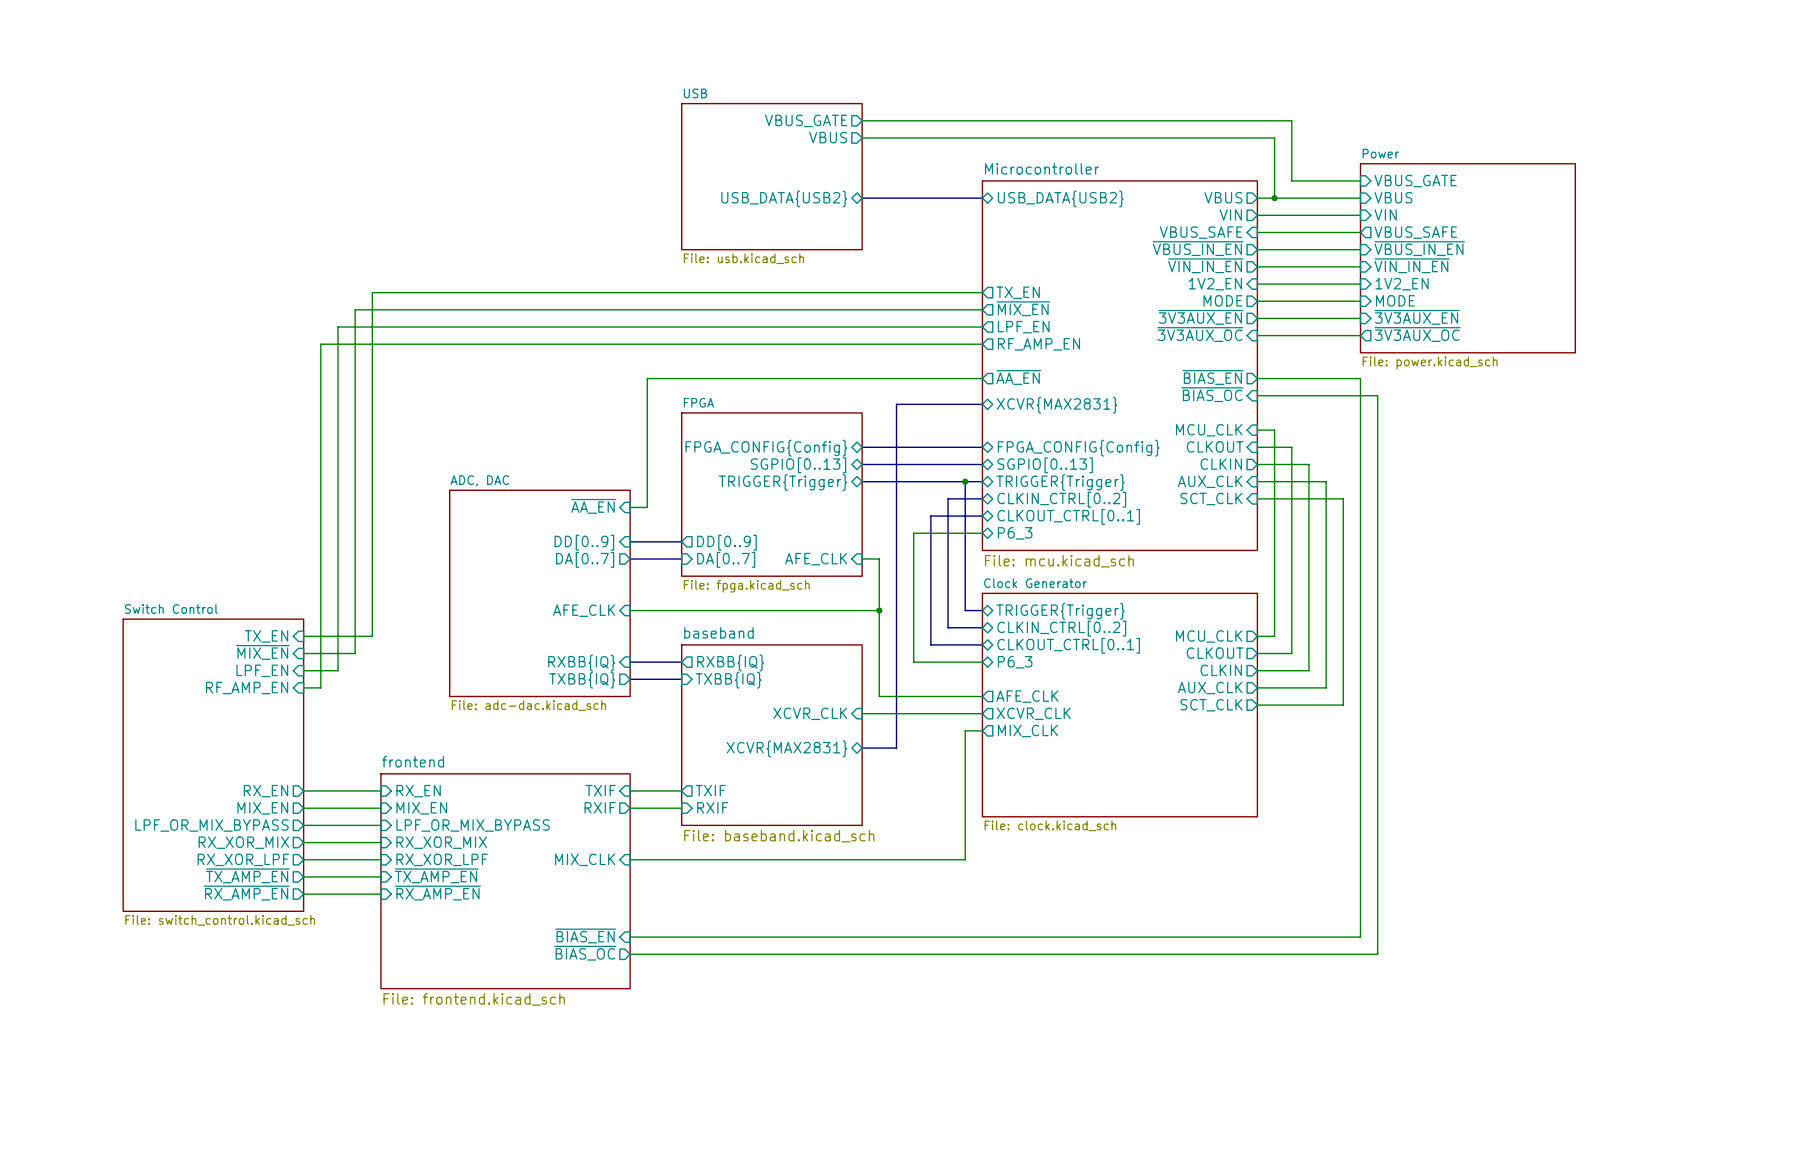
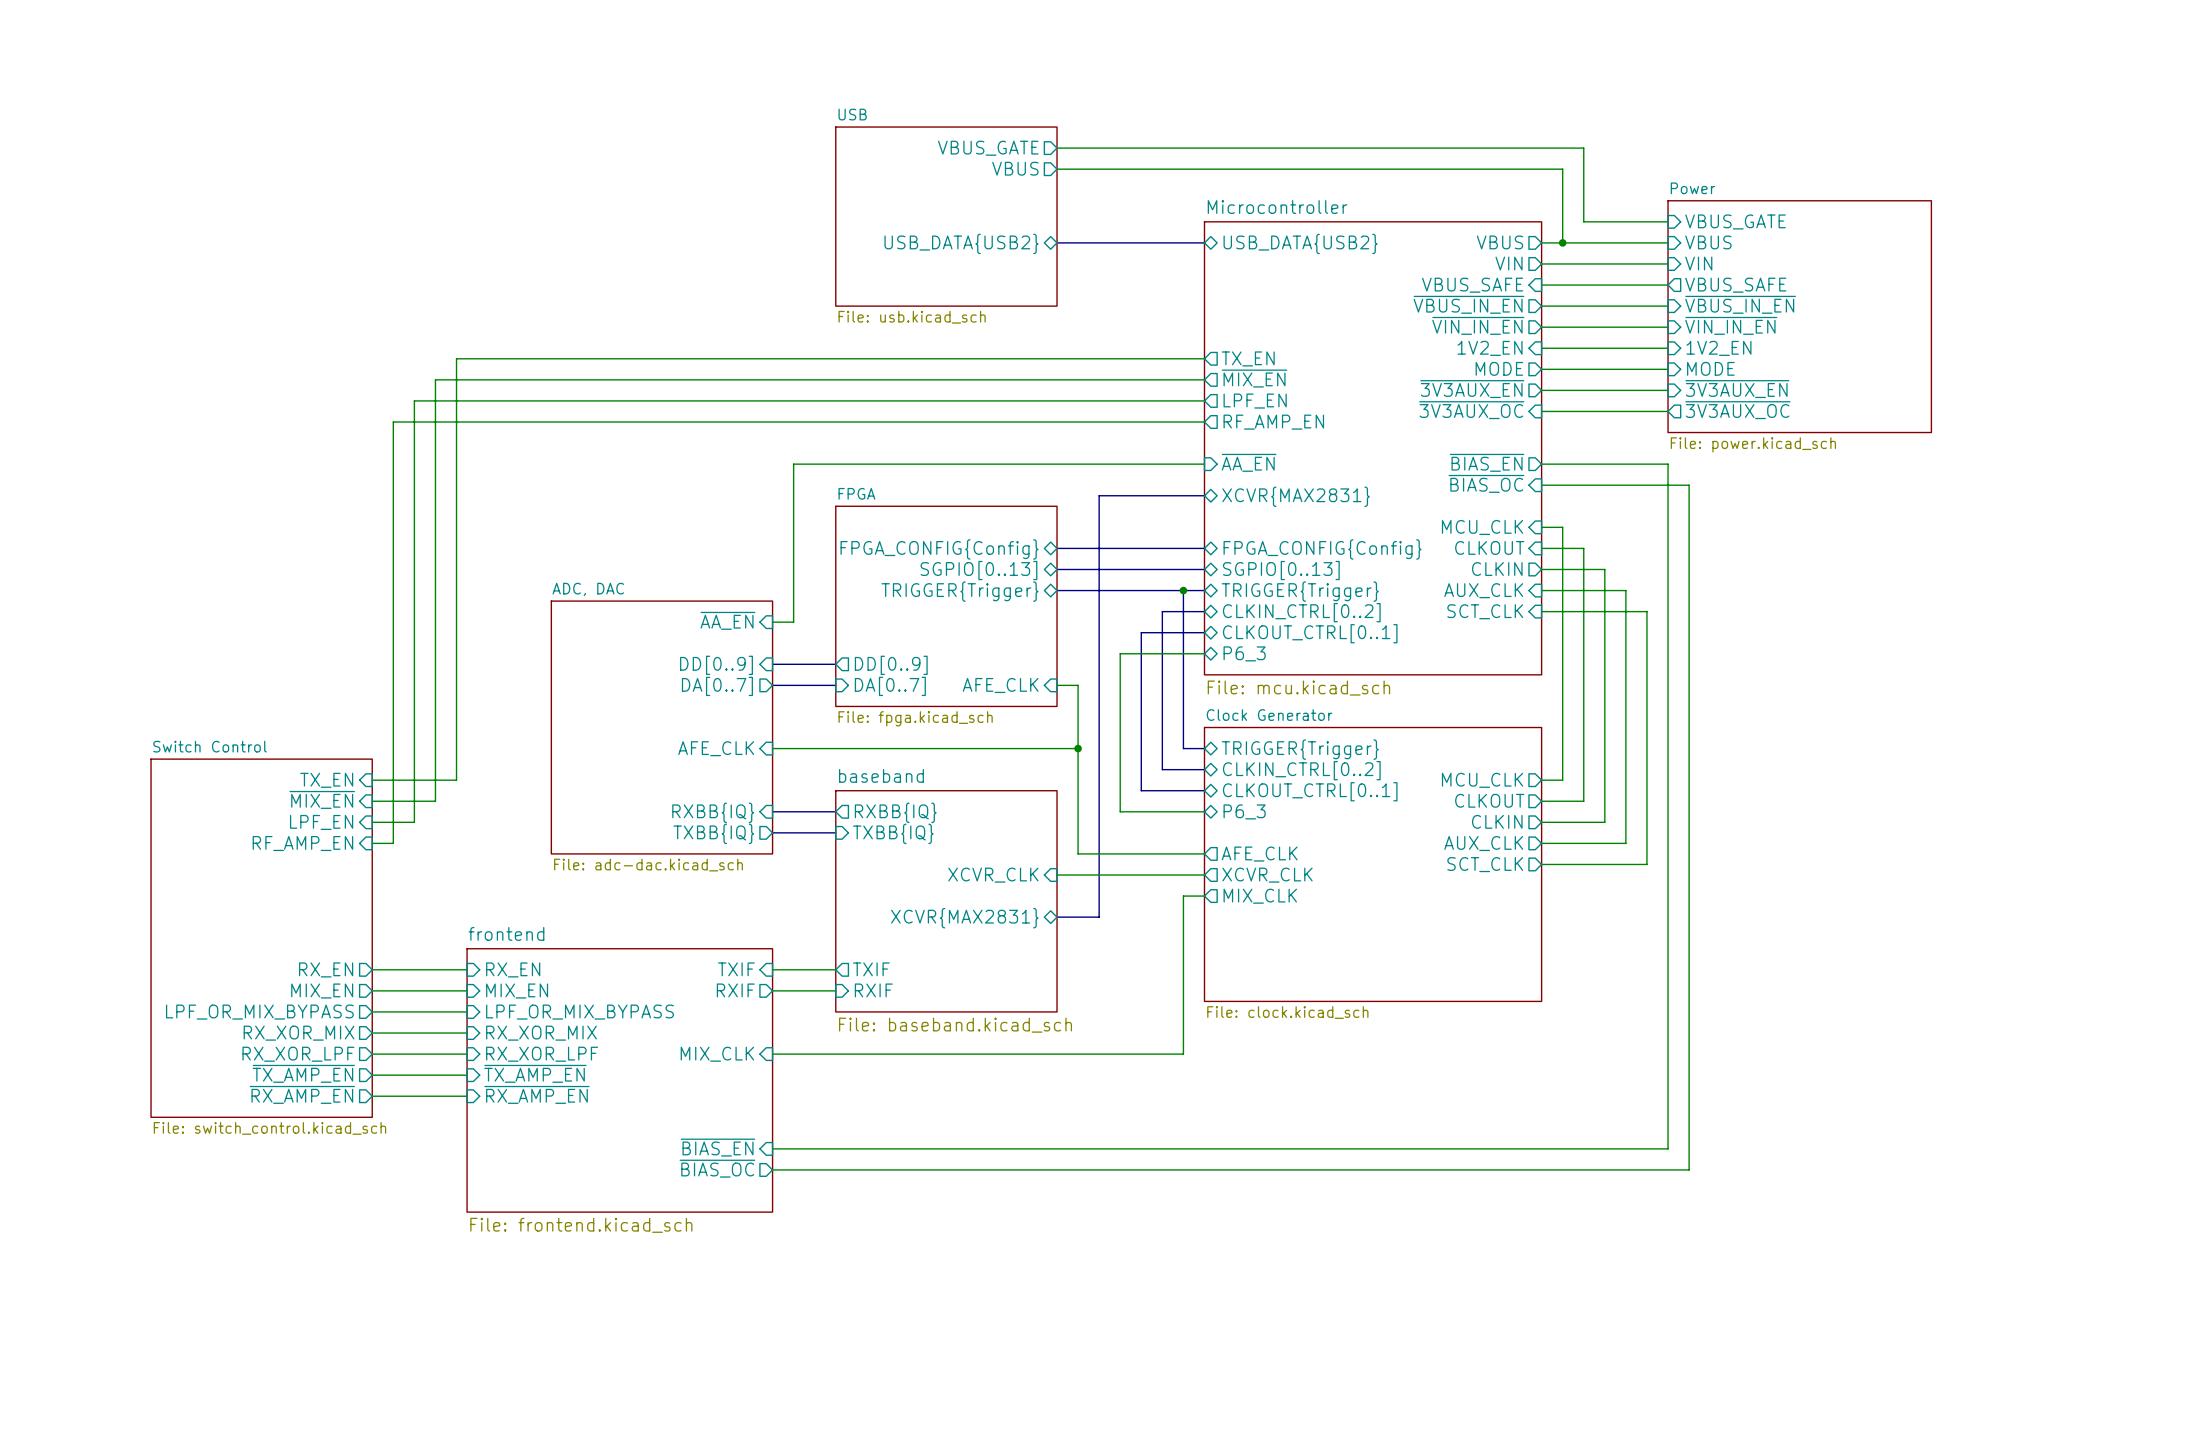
sheet pin shape: output (1018, 377) -> input (1249, 462)

